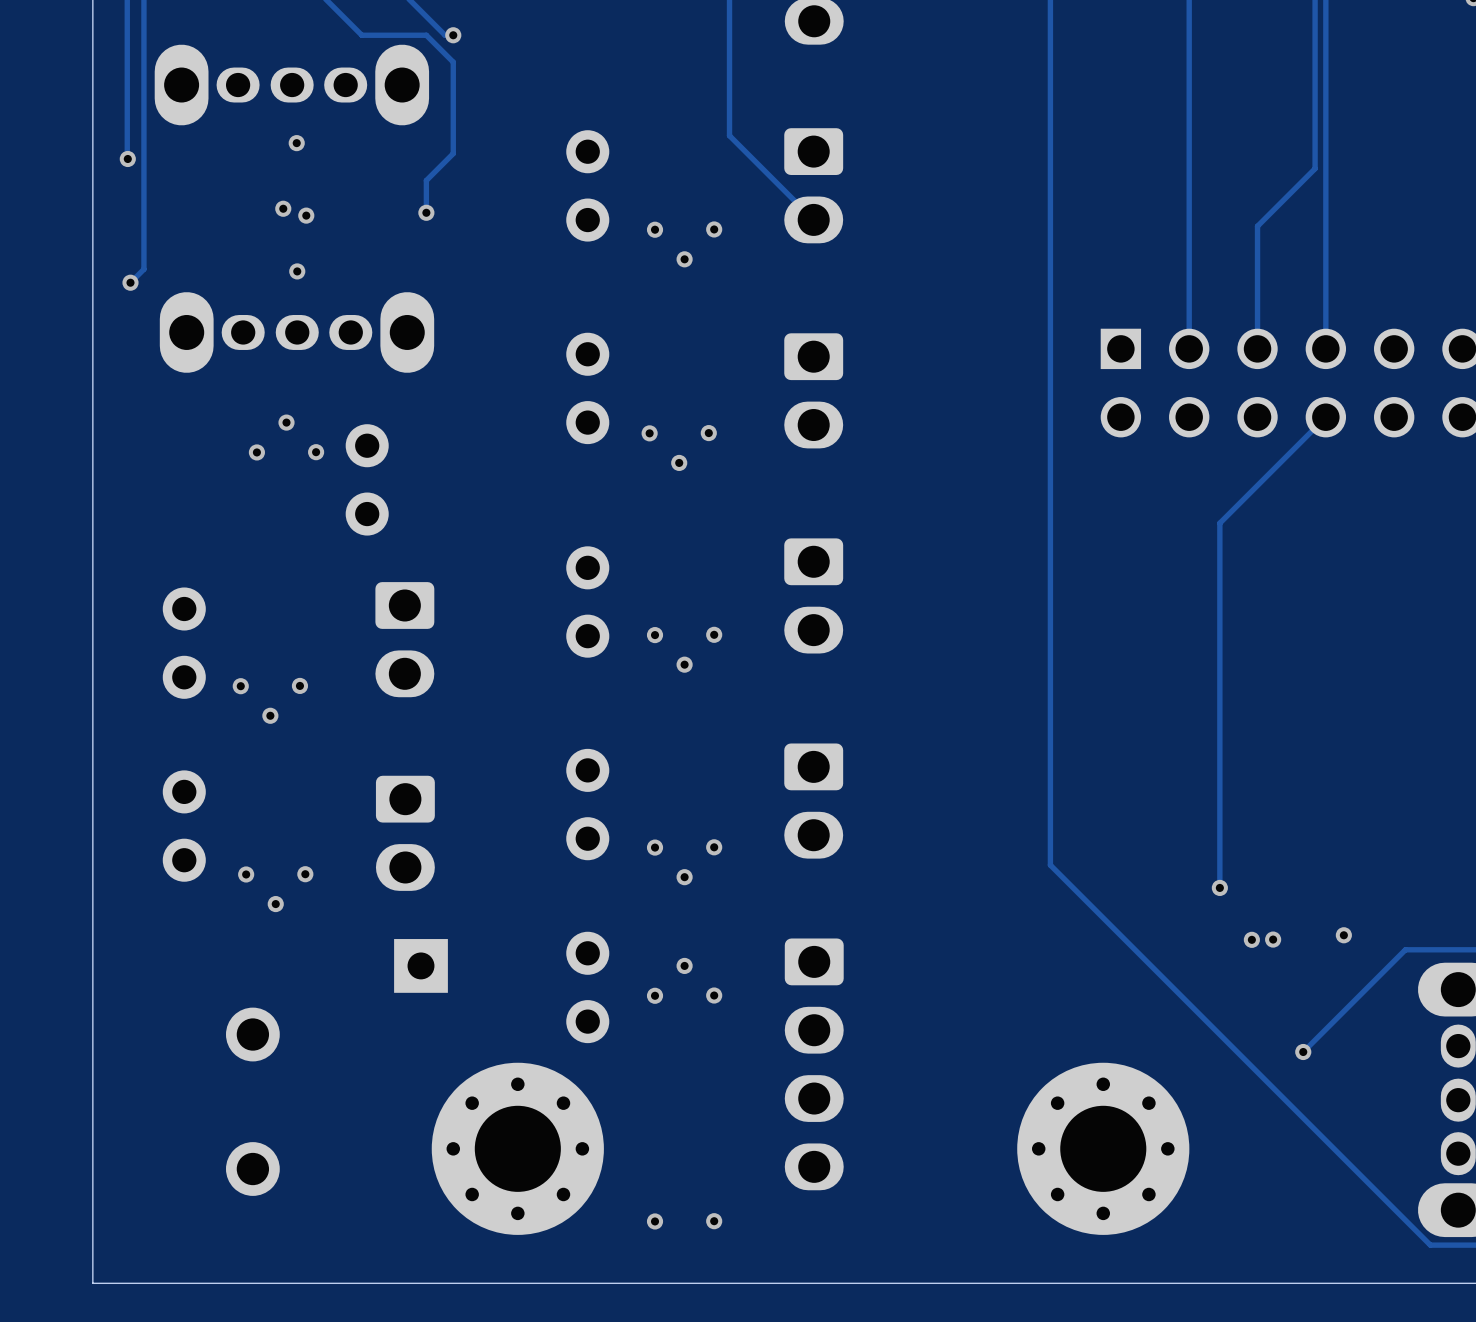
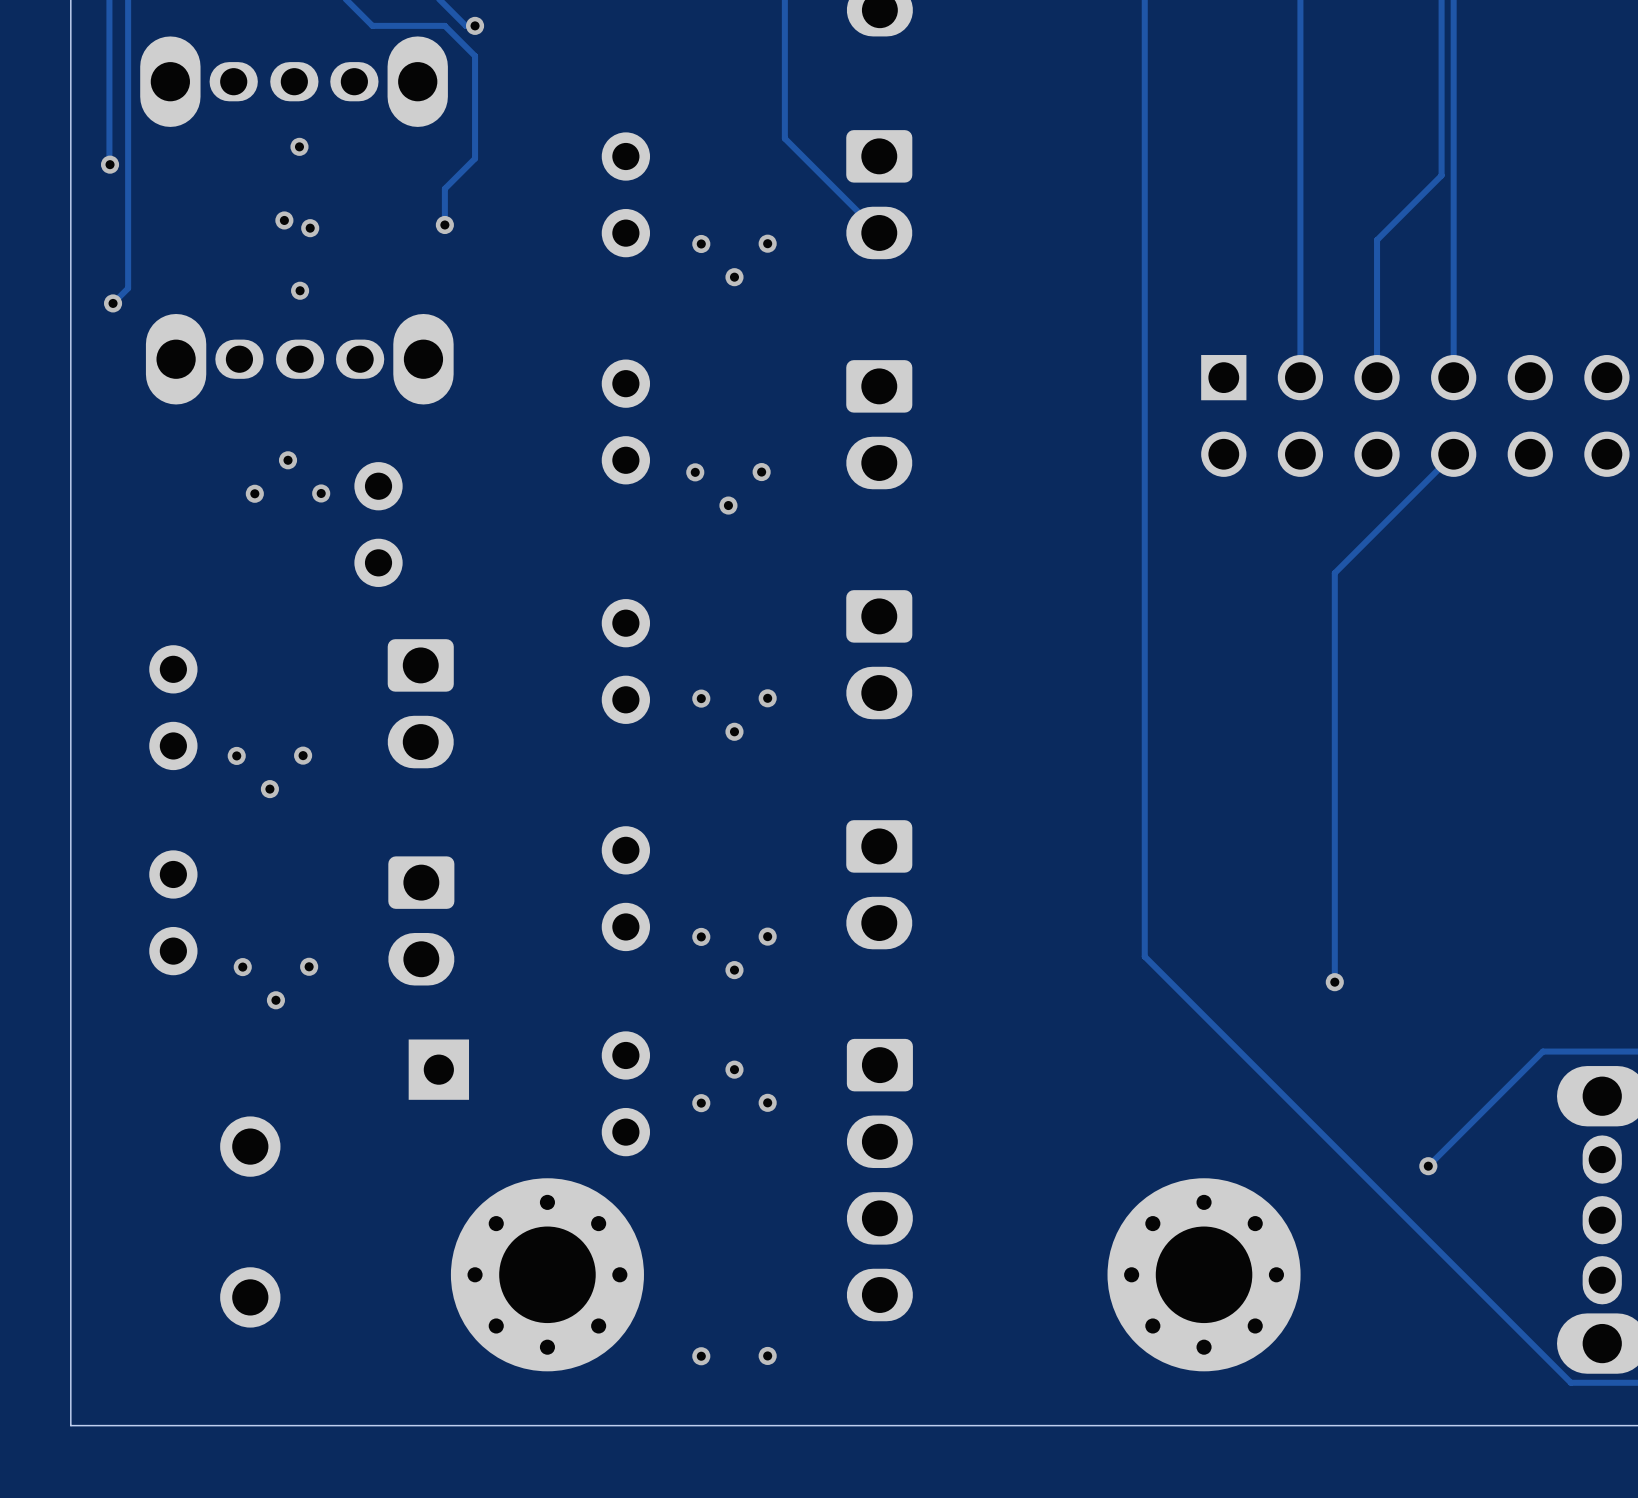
via: (1343, 935) -> none
via: (1251, 939) -> none
via: (1273, 939) -> none

